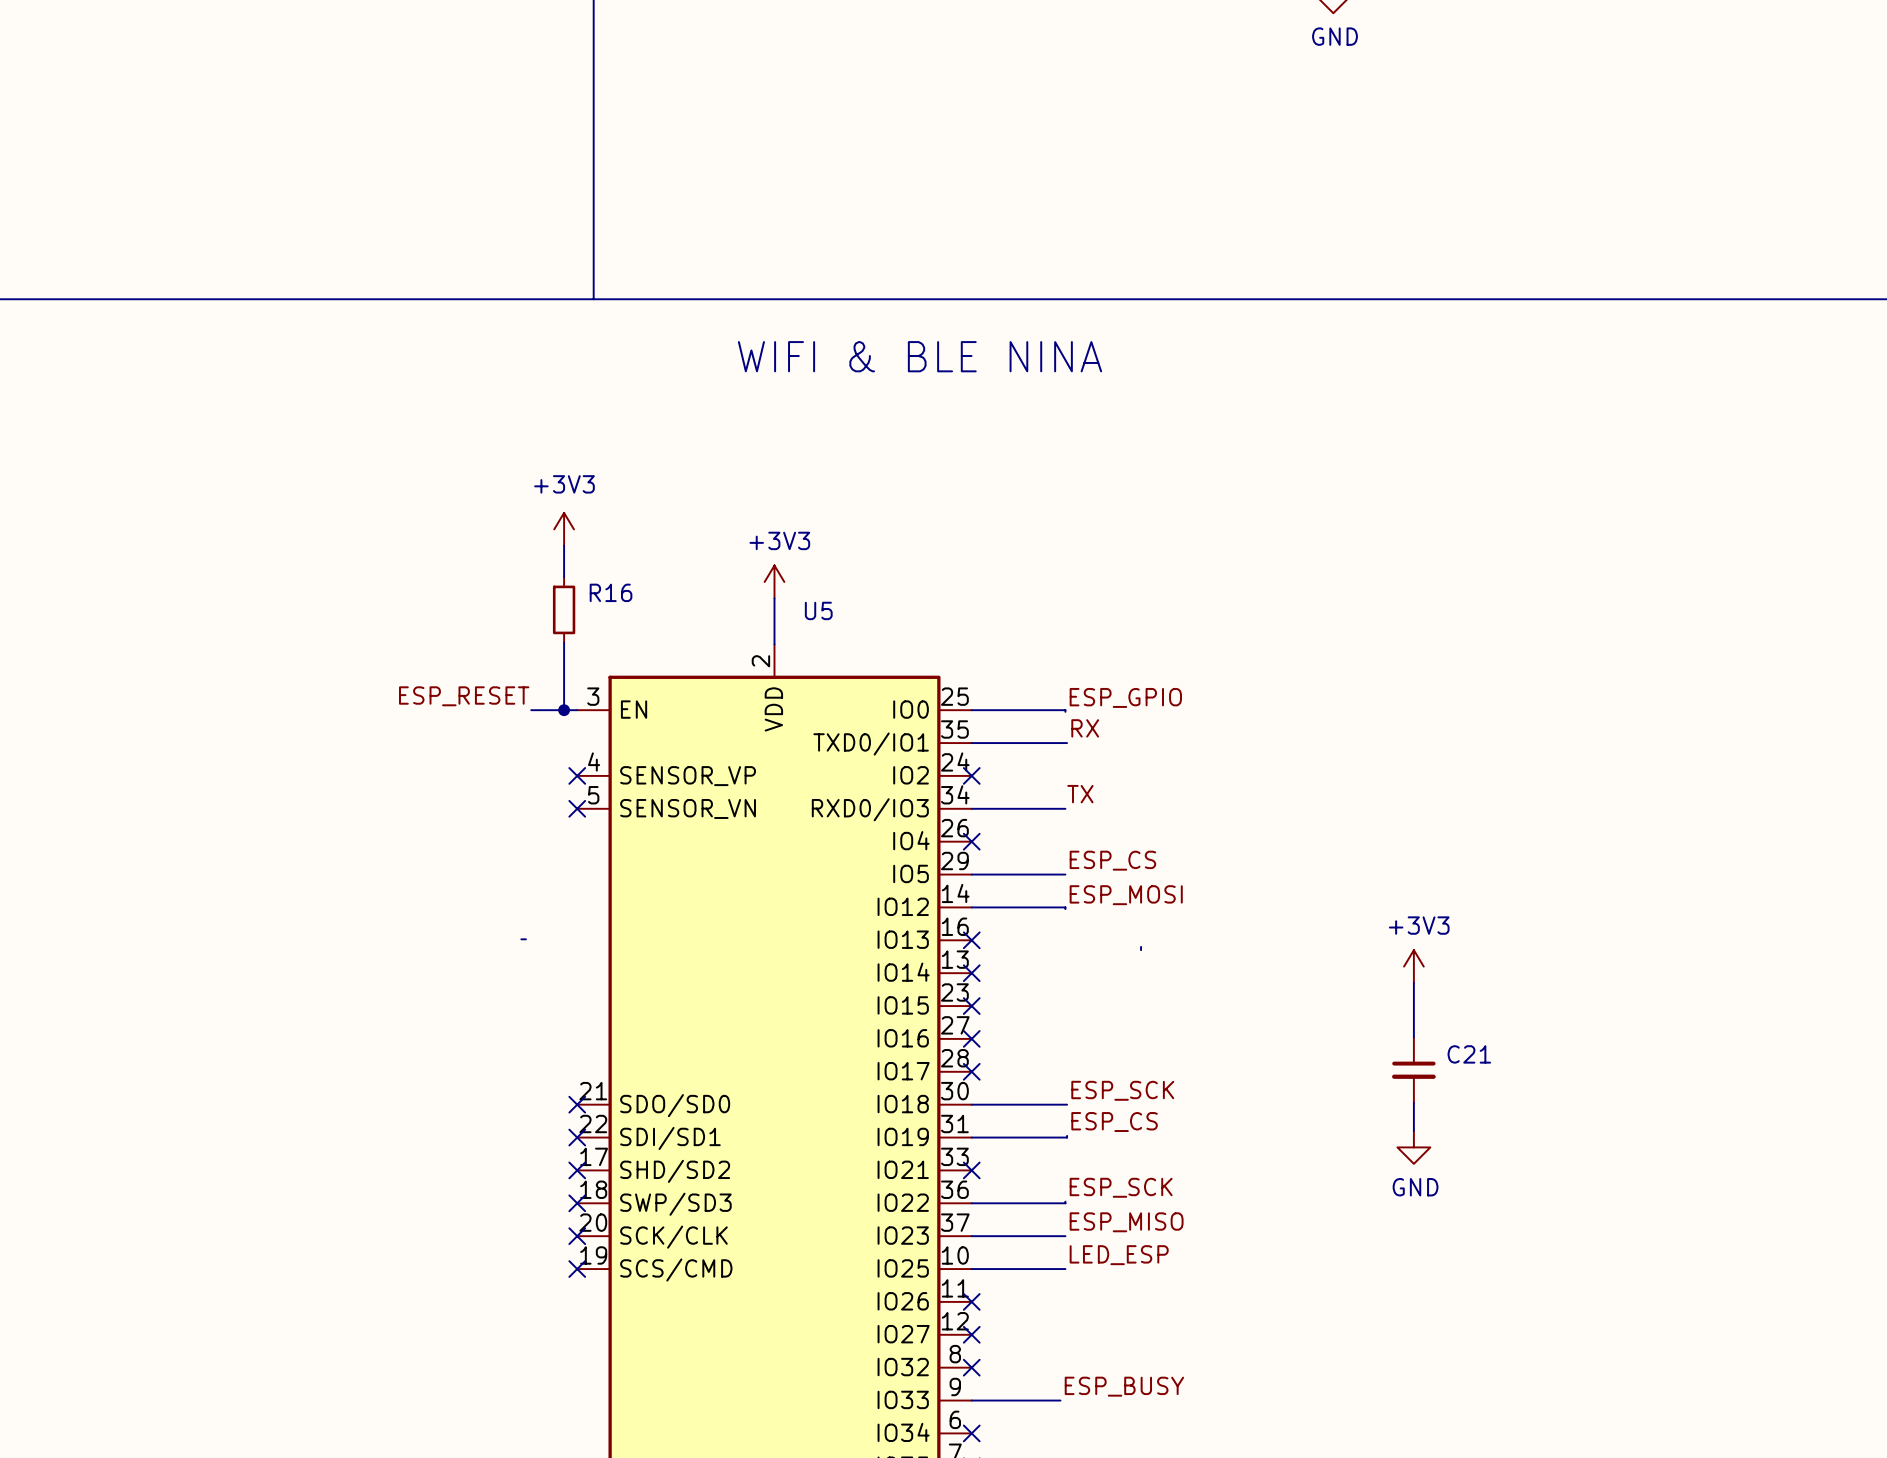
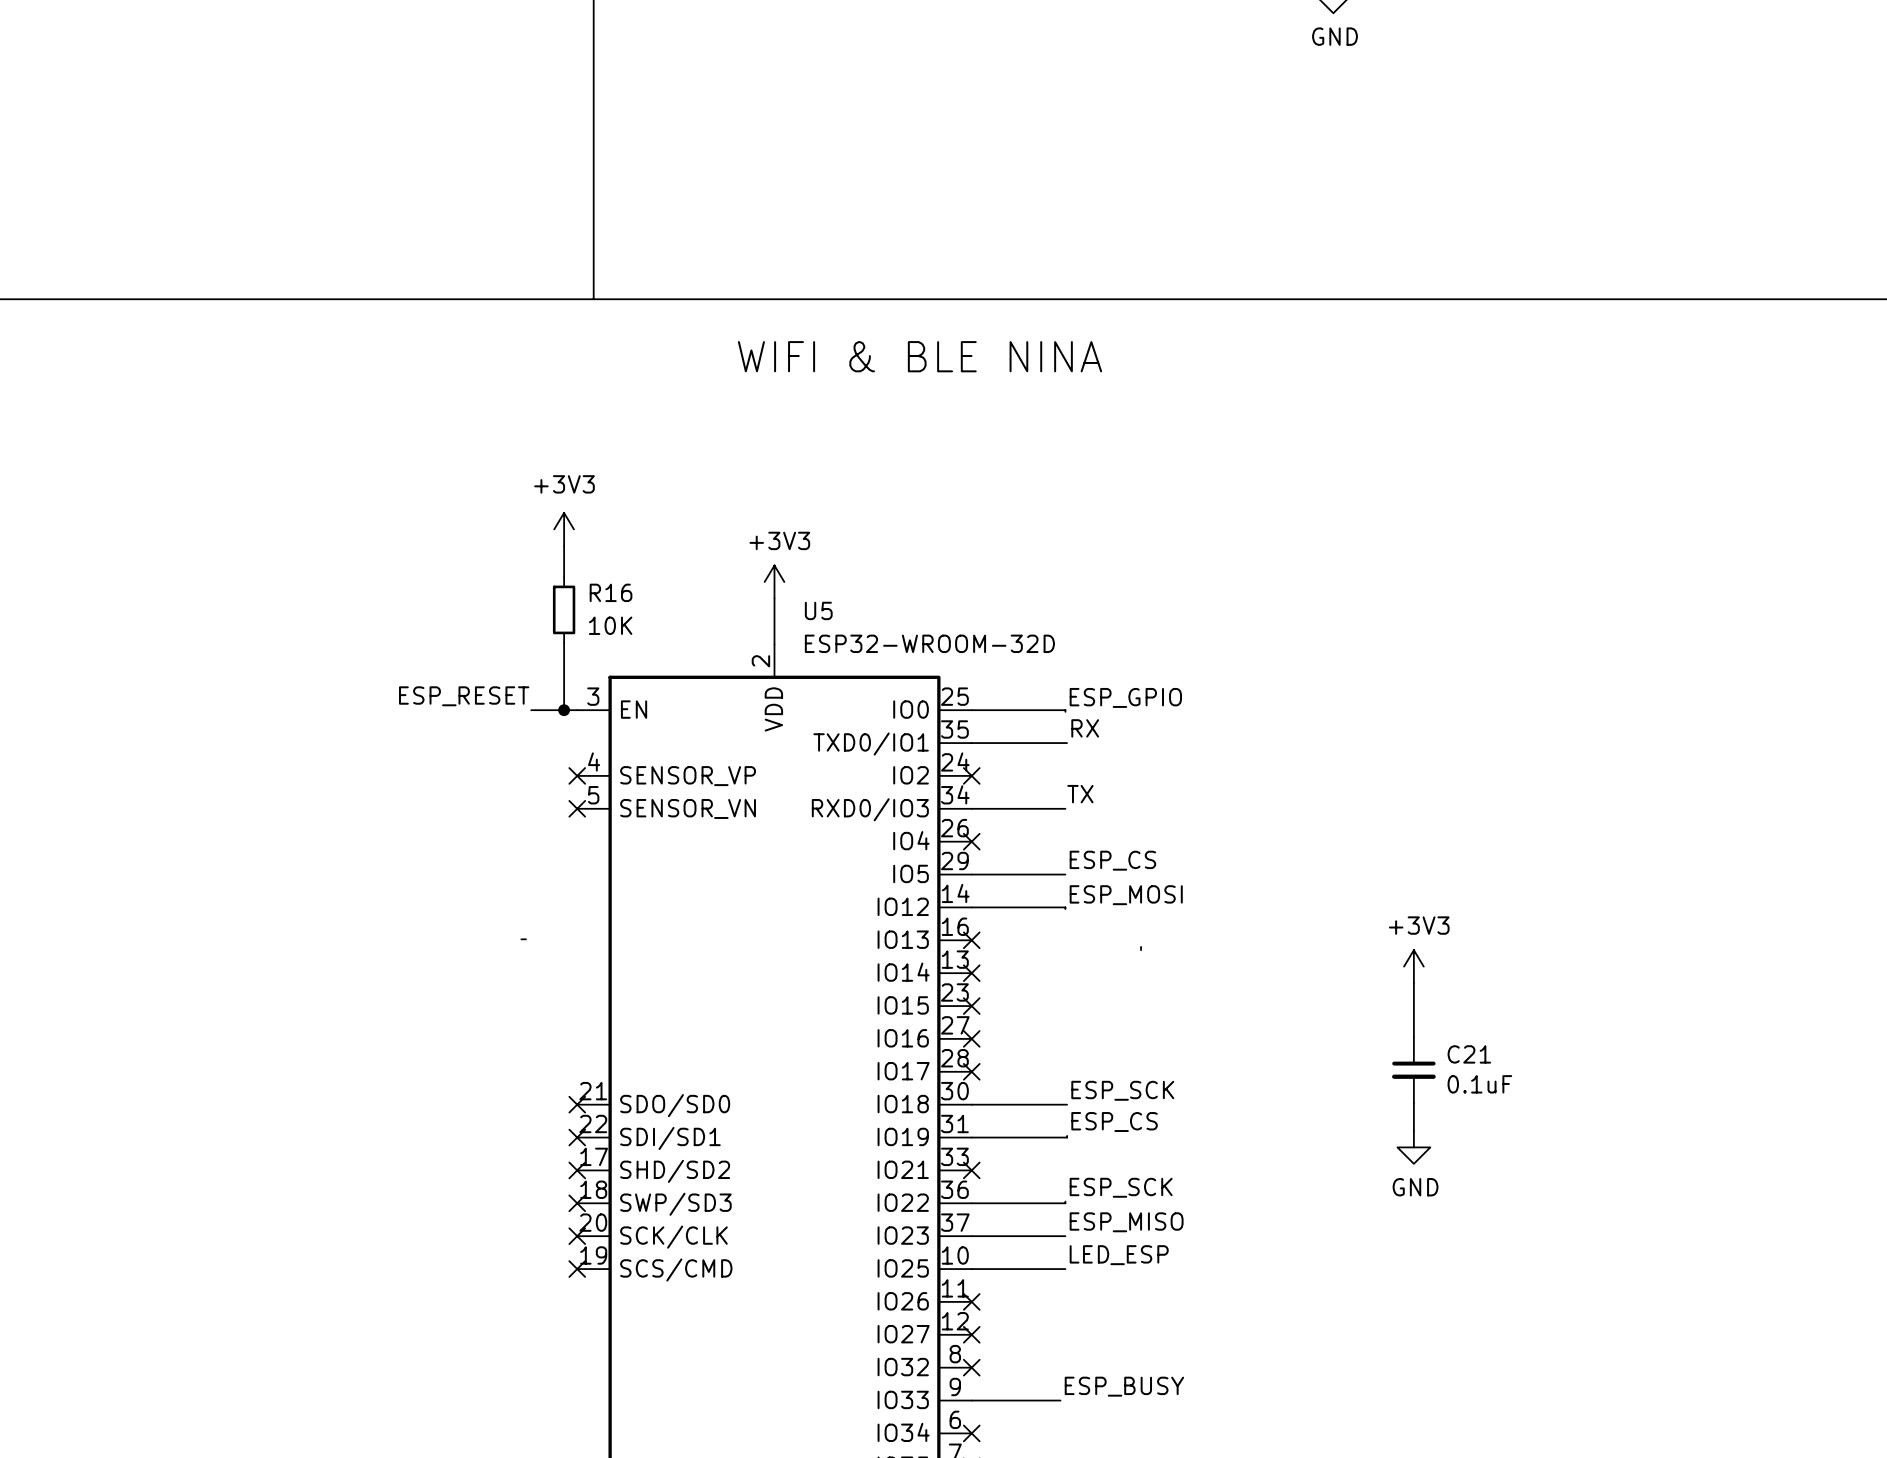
R16 value: none -> 10K (610, 625)
U5 value: none -> ESP32-WROOM-32D (929, 643)
C21 value: none -> 0.1uF (1479, 1084)

